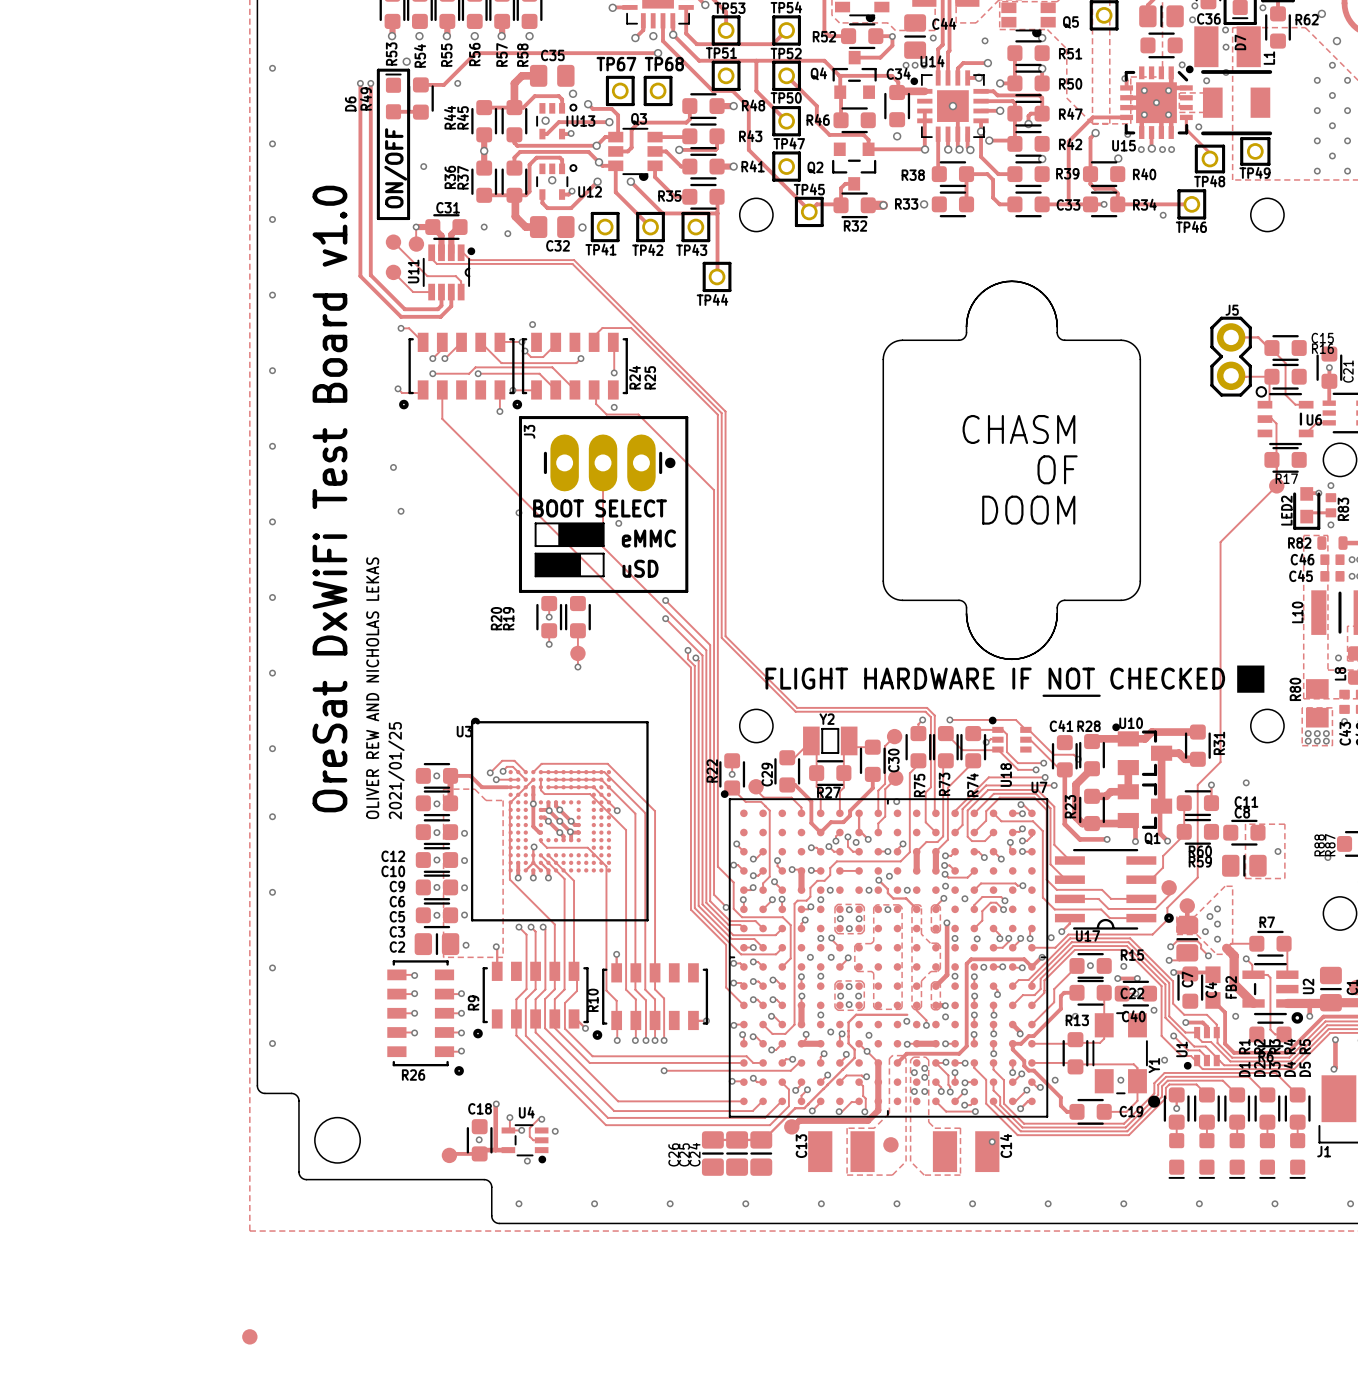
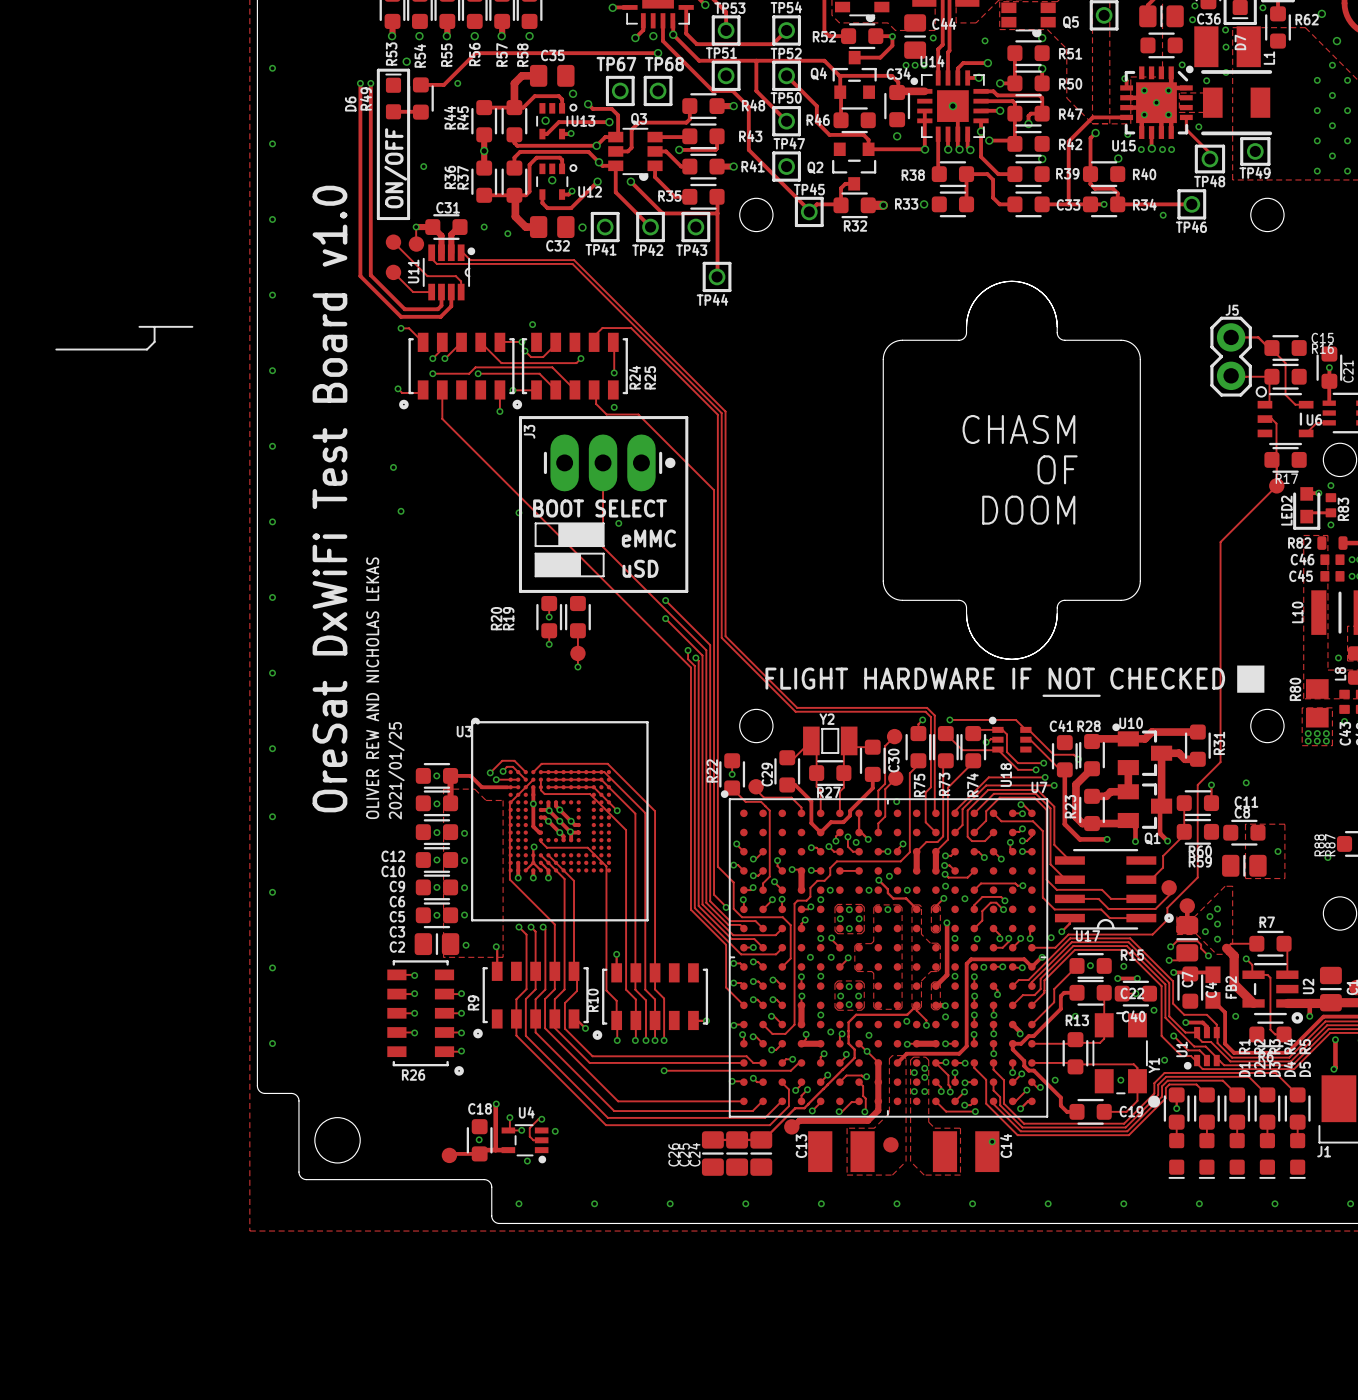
line: none -> (139, 326) (192, 326)
line: none -> (154, 326) (154, 341) (147, 349) (56, 349)
track: none -> (916, 1010) (916, 1005) (907, 1014)
part: (249, 1336) -> none

